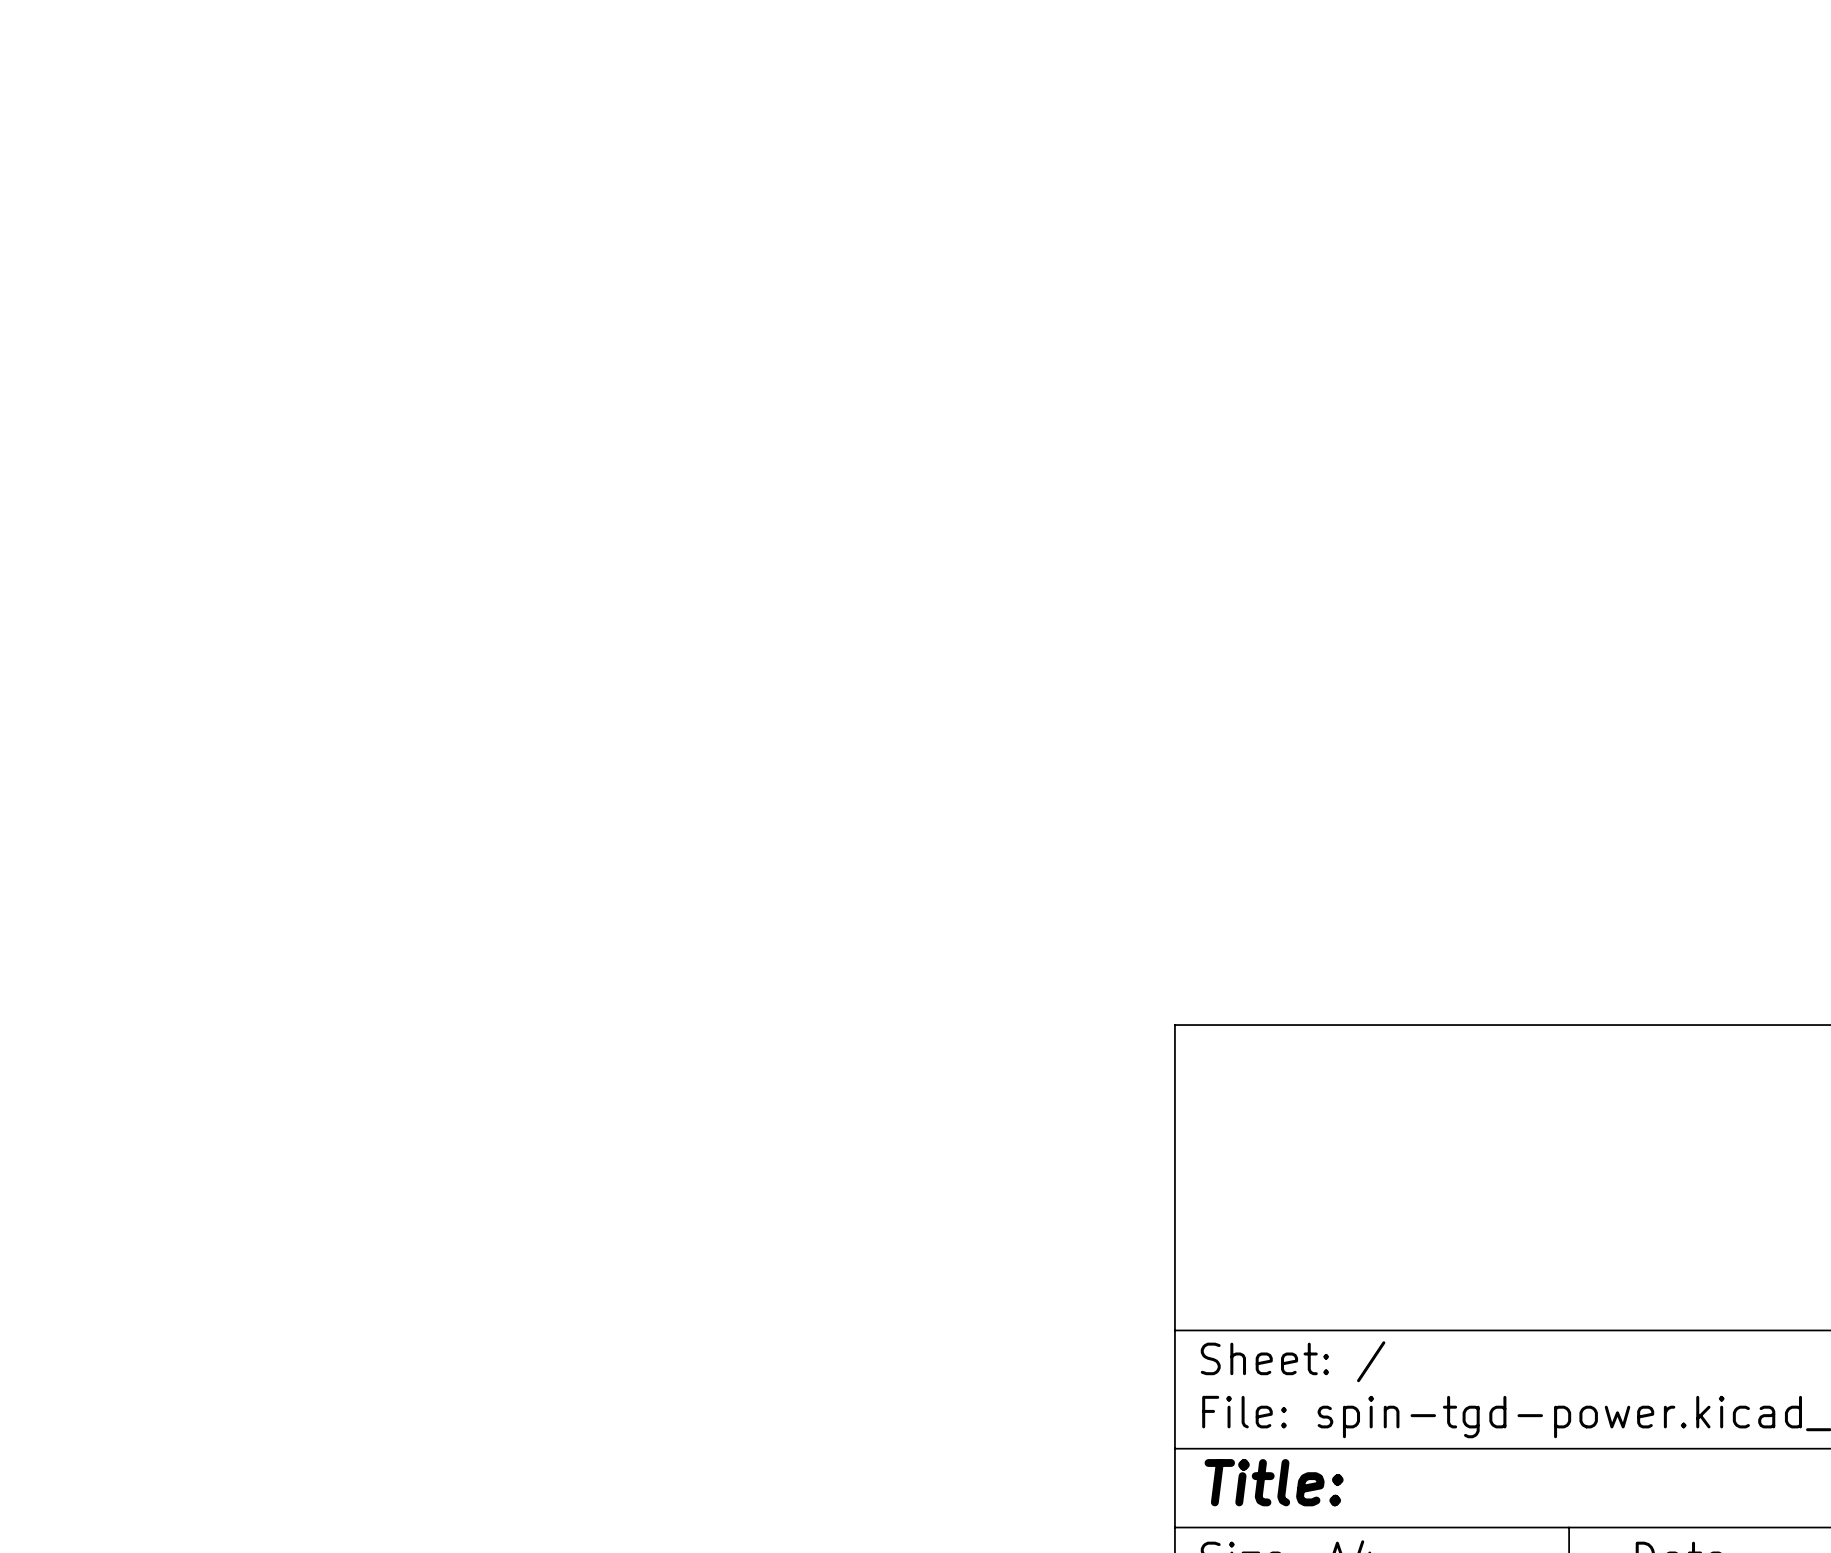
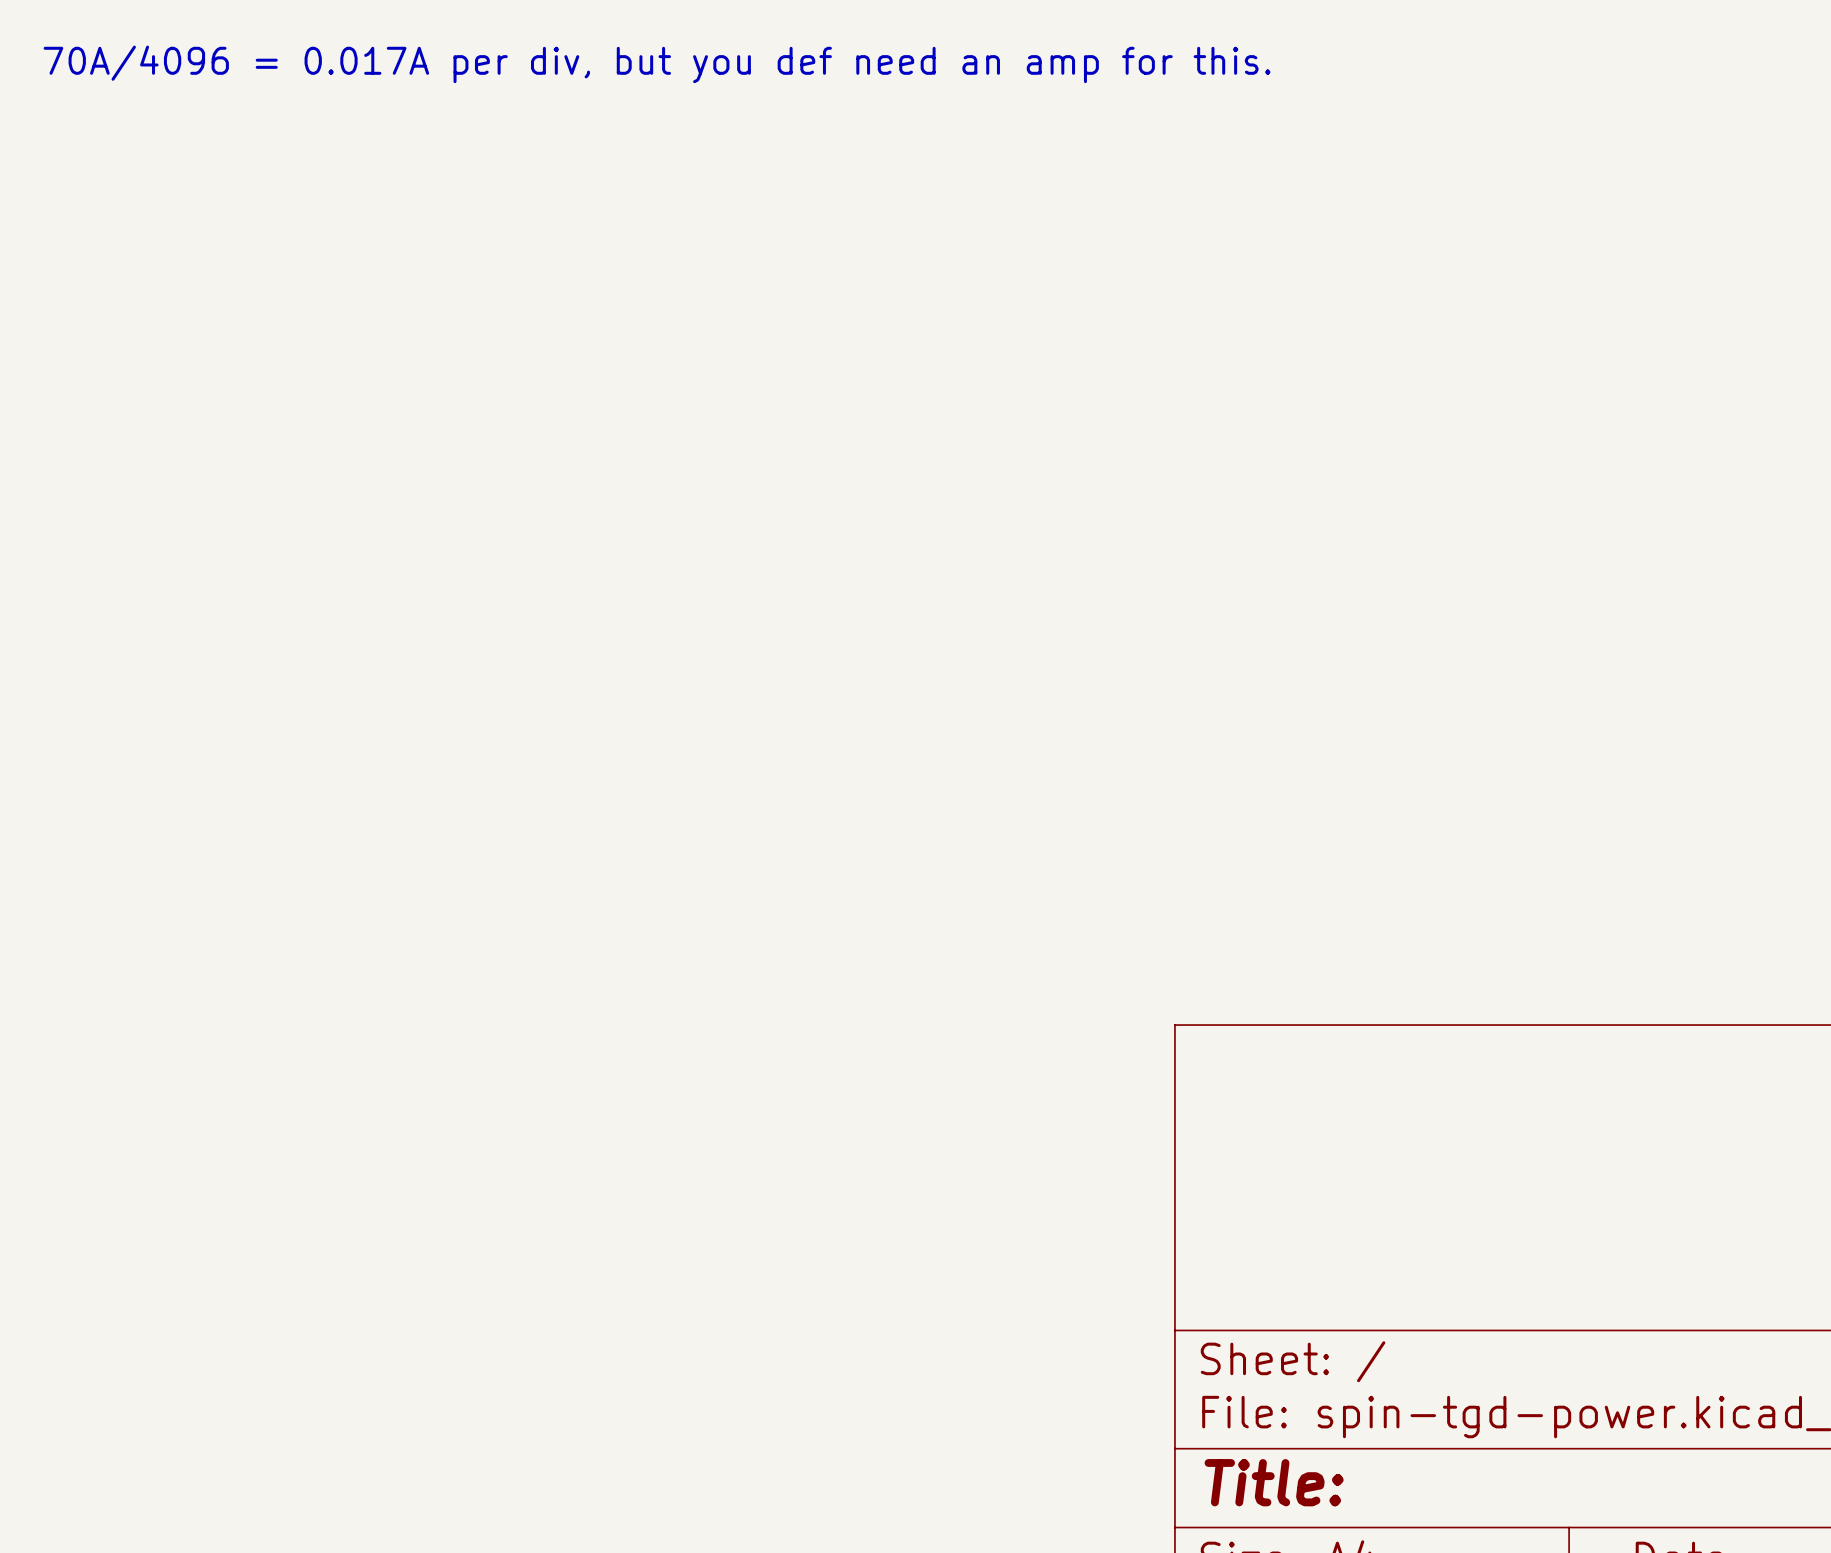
text: none -> 70A/4096 = 0.017A per div, but you def need an amp for this. (657, 64)

